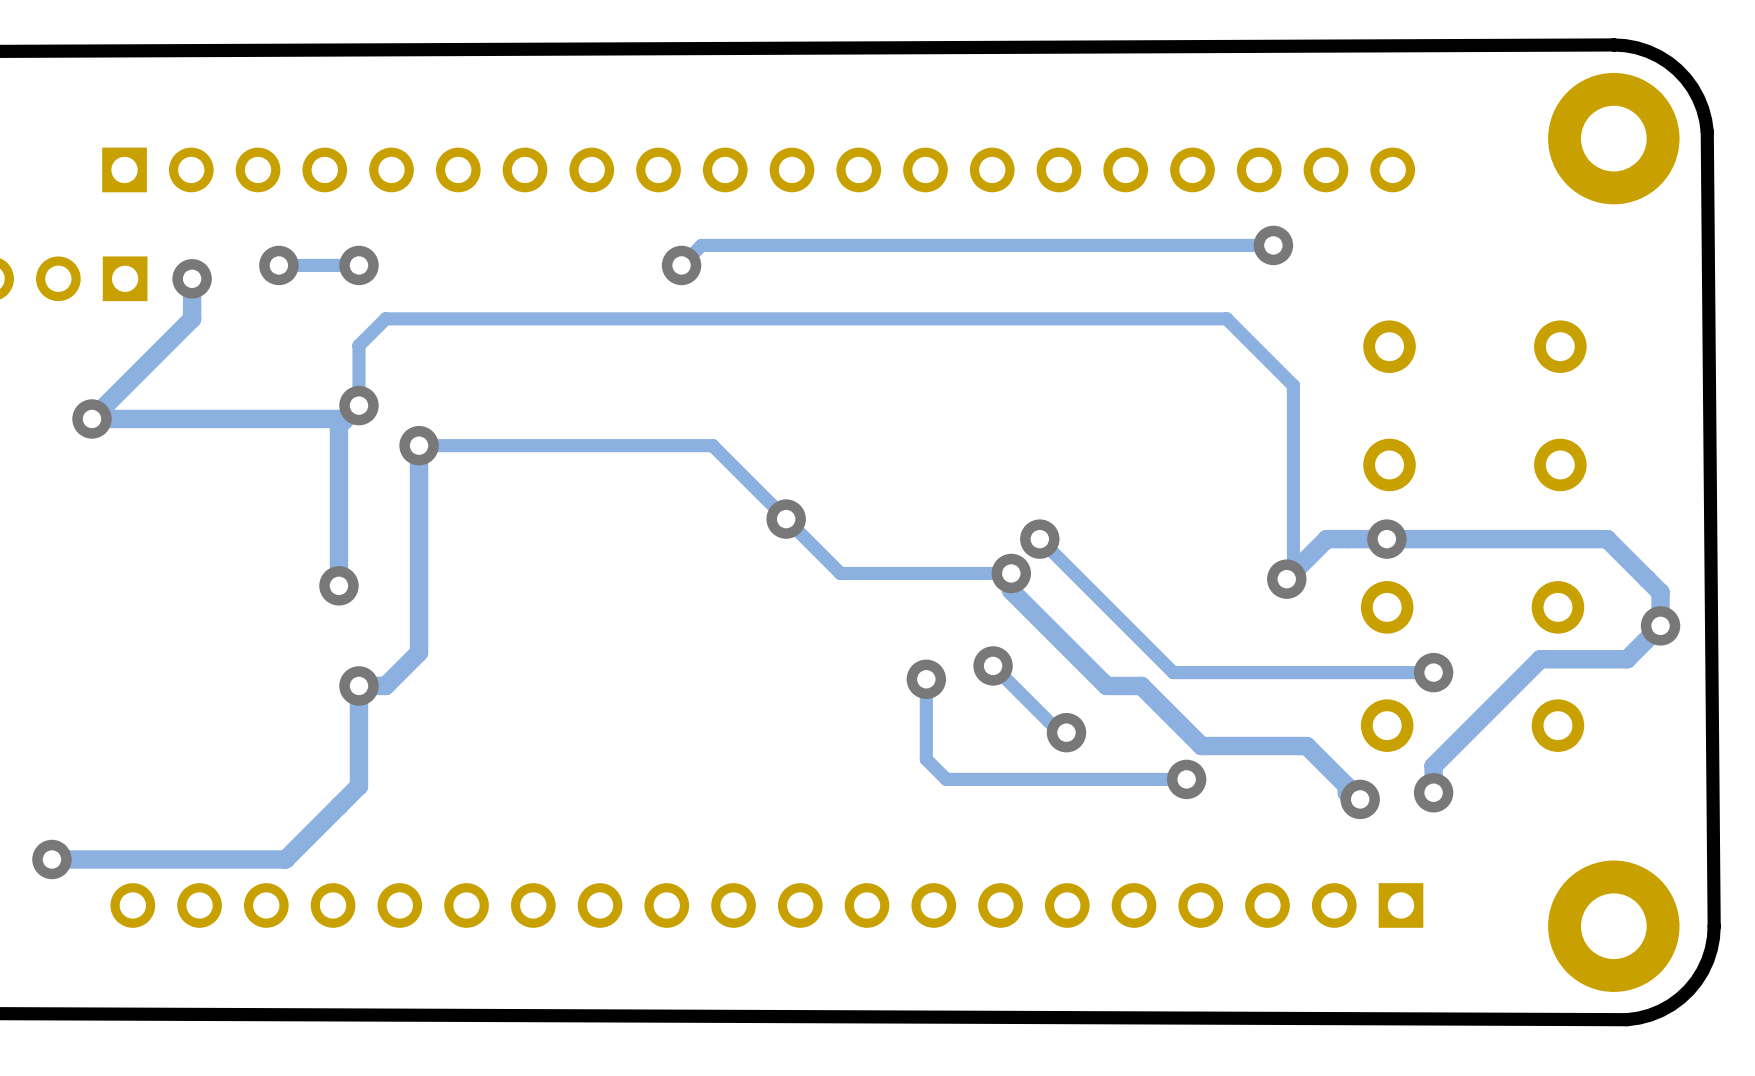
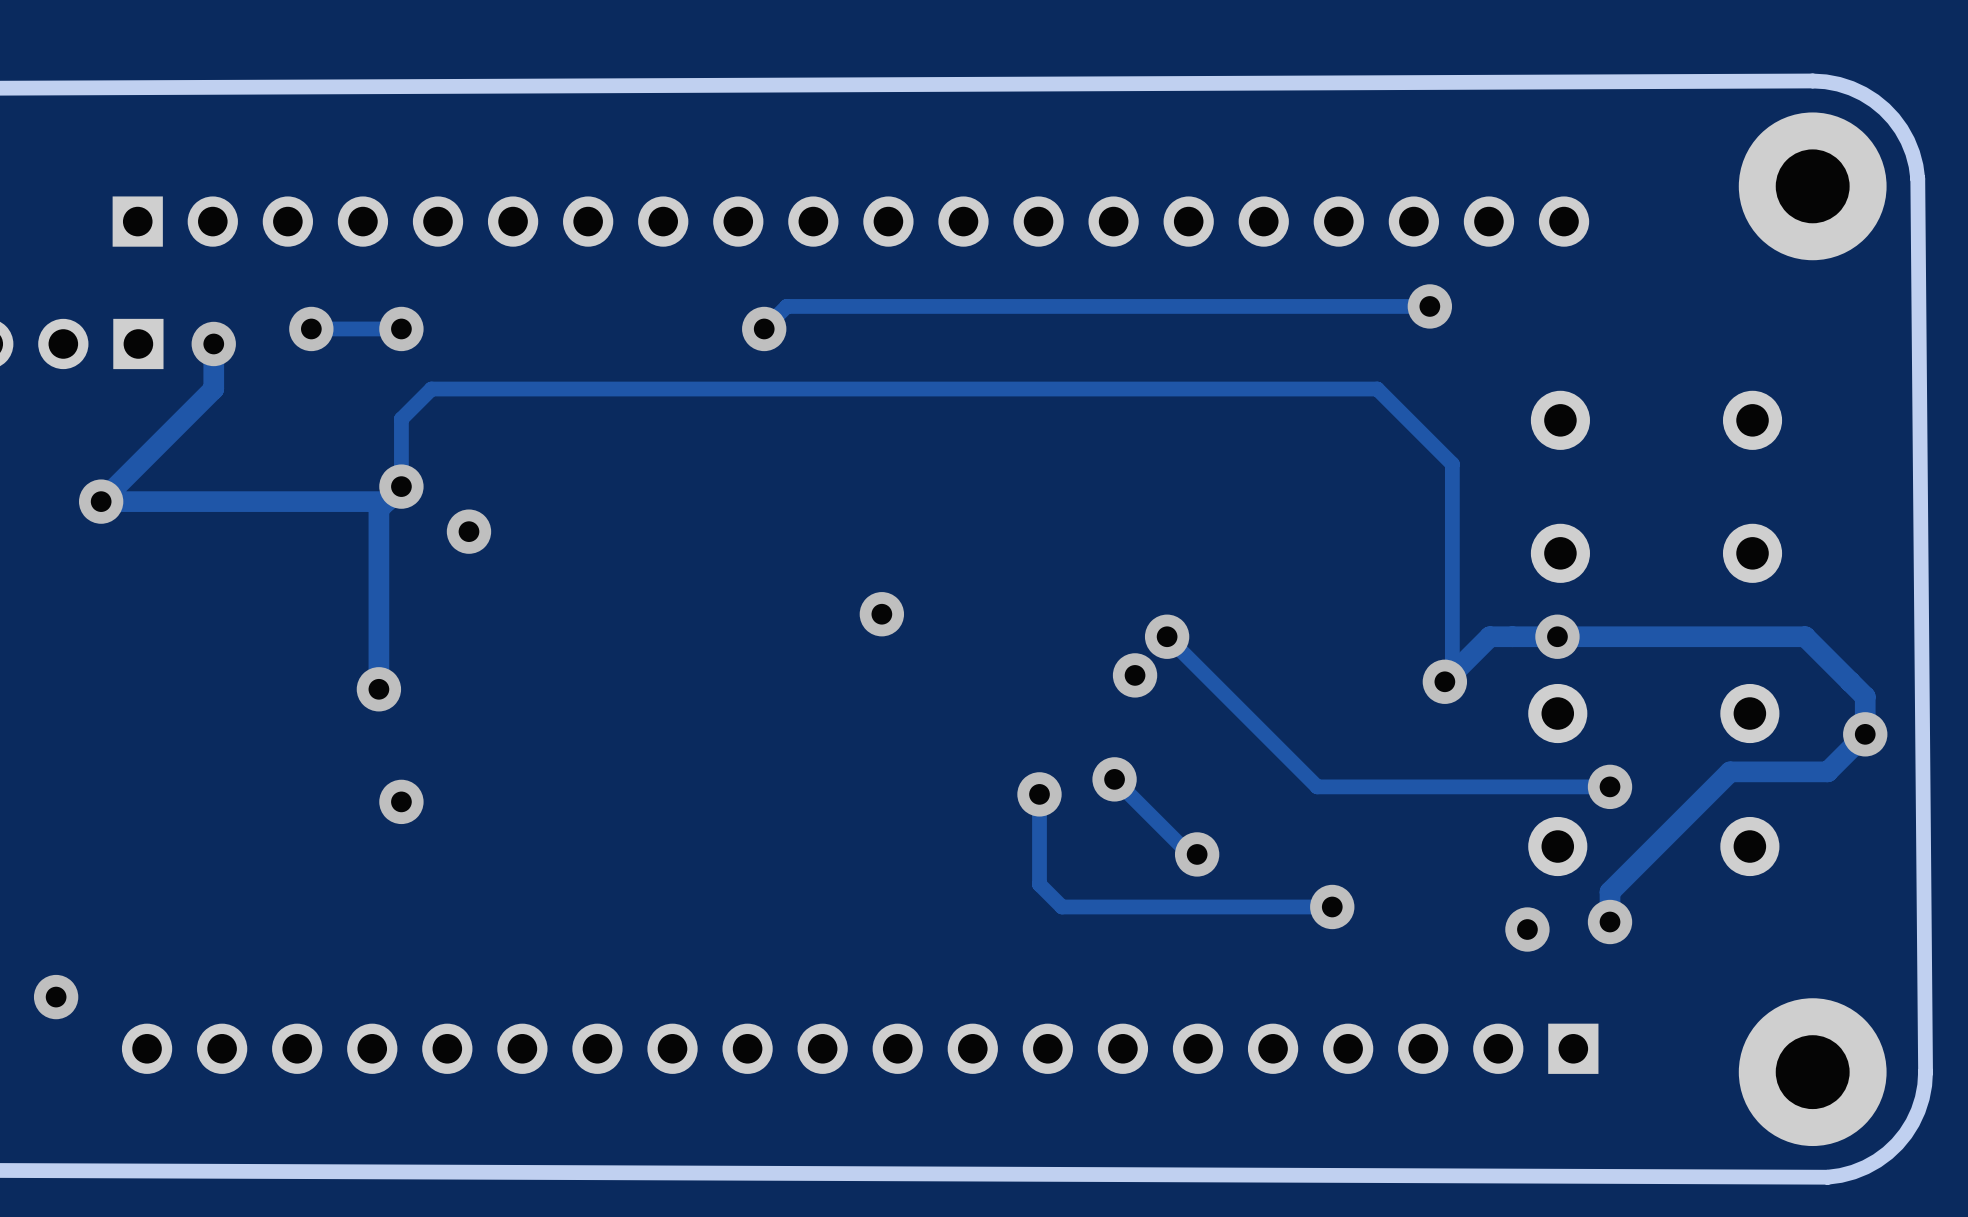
track: (1353, 799) (1346, 792) (1346, 786) (1306, 746) (1201, 746) (1141, 685) (1106, 685) (1011, 590) (1011, 573) (840, 573) (712, 445) (419, 445) (419, 652) (385, 685) (358, 685) (358, 786) (285, 859) (51, 859) -> none

